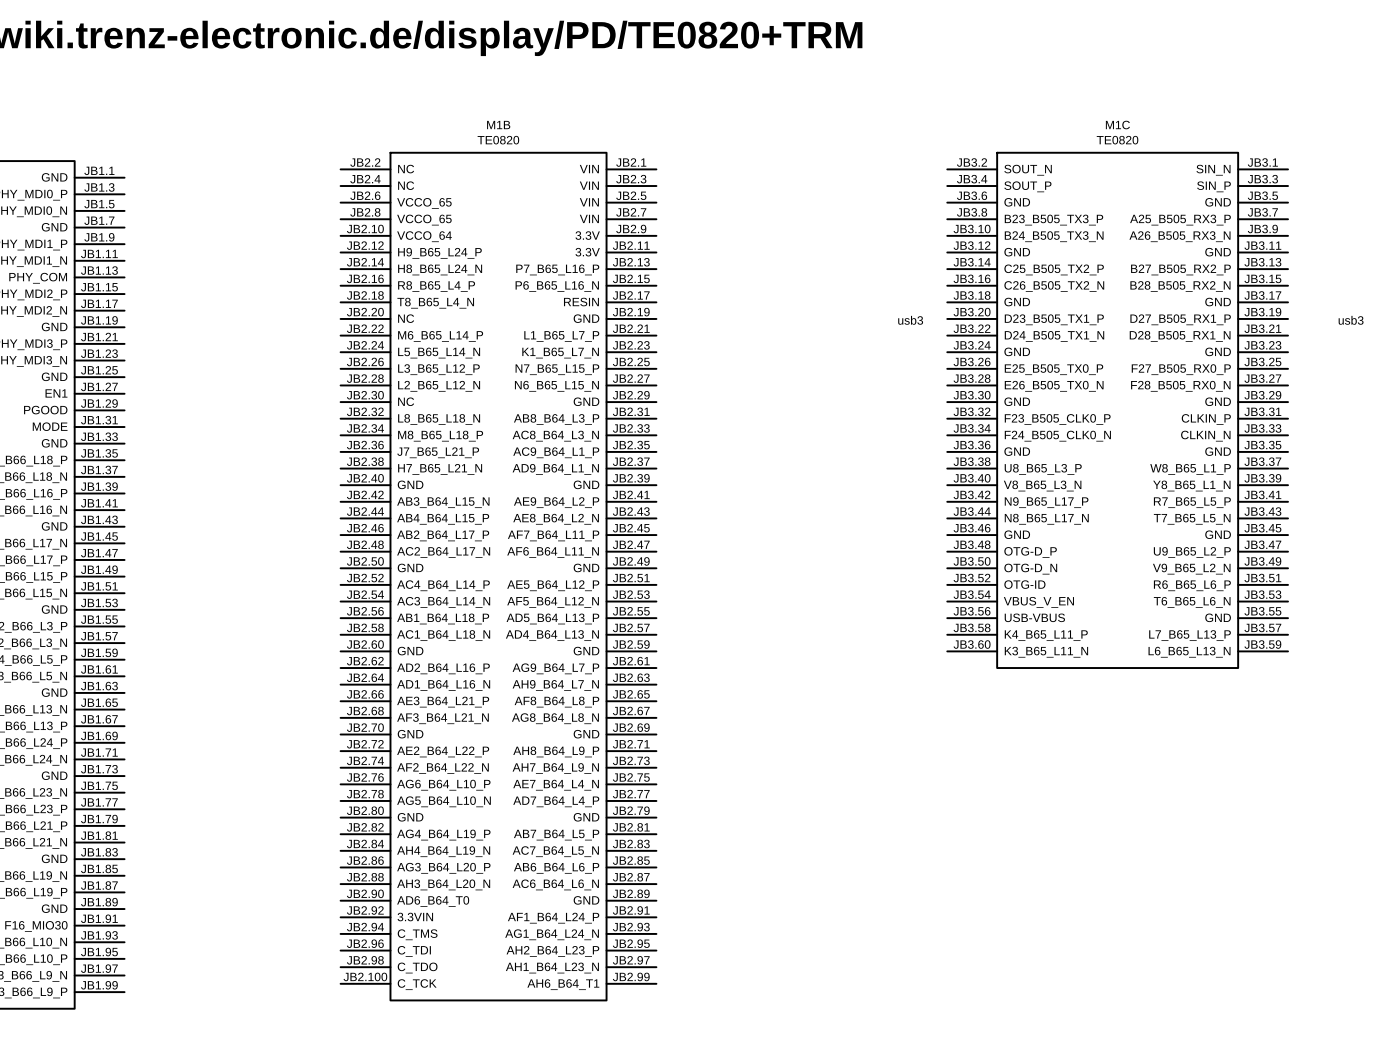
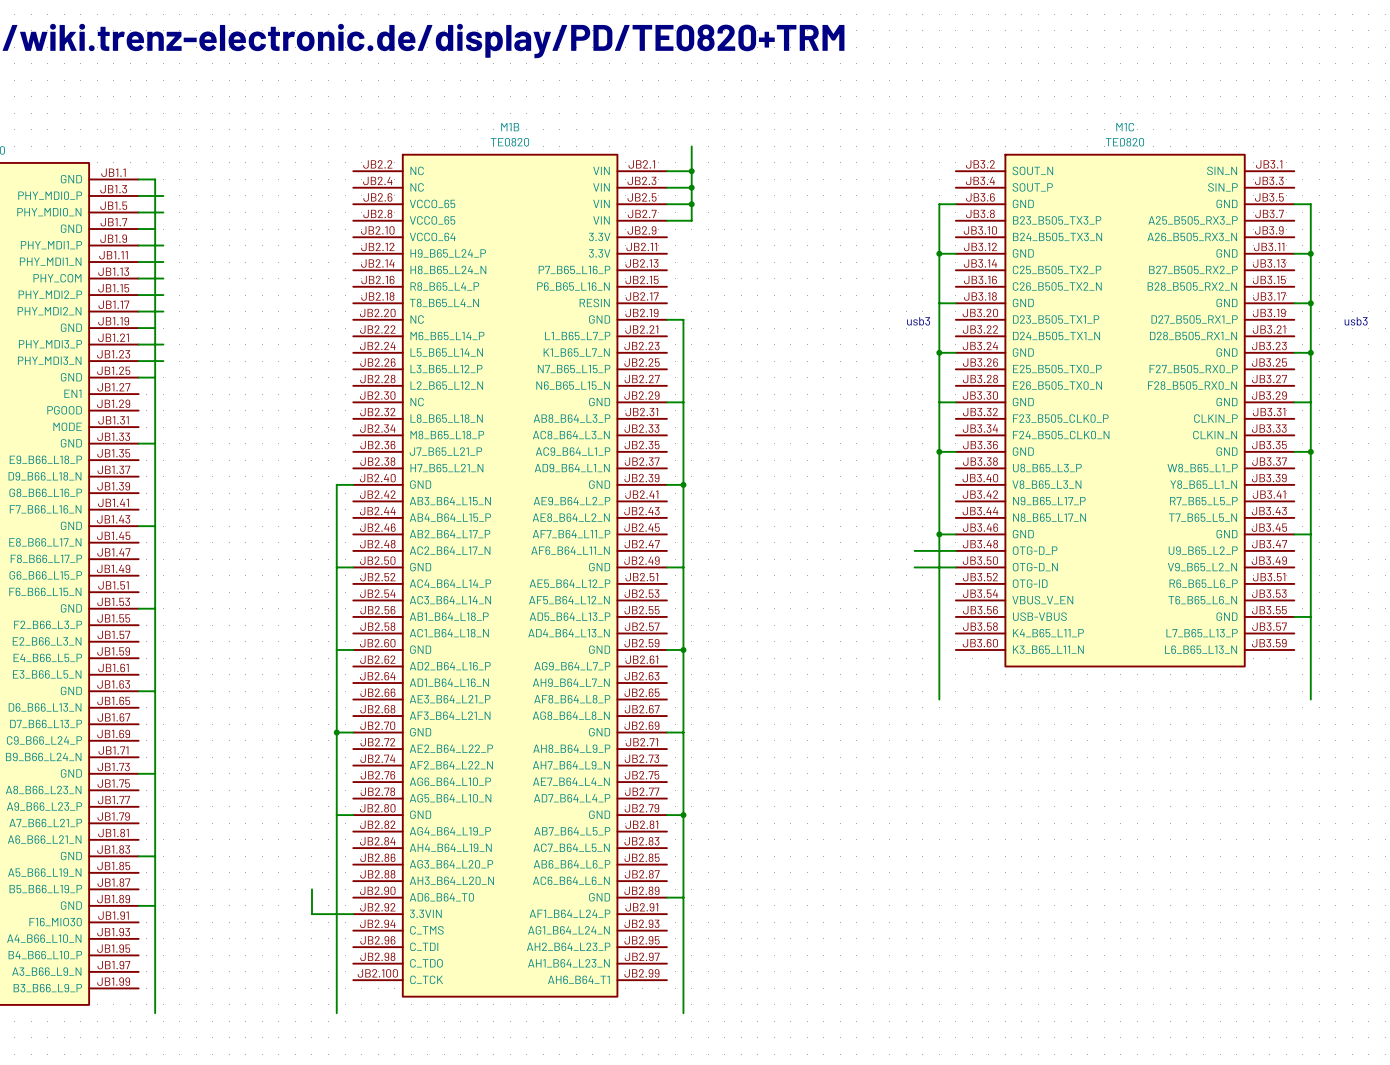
wire: none -> (691, 146) (691, 220) (666, 220)
wire: none -> (666, 171) (691, 171)
junction: none -> (691, 171)
wire: none -> (138, 179) (155, 179) (155, 1013)
wire: none -> (666, 187) (691, 187)
junction: none -> (691, 187)
wire: none -> (138, 195) (163, 195)
wire: none -> (666, 204) (691, 204)
junction: none -> (691, 204)
wire: none -> (955, 204) (939, 204) (939, 699)
wire: none -> (1294, 204) (1310, 204) (1310, 699)
wire: none -> (138, 212) (163, 212)
wire: none -> (138, 229) (155, 229)
wire: none -> (138, 245) (163, 245)
wire: none -> (939, 253) (955, 253)
junction: none -> (939, 253)
wire: none -> (1294, 253) (1310, 253)
junction: none -> (1310, 253)
wire: none -> (138, 262) (163, 262)
wire: none -> (138, 278) (163, 278)
wire: none -> (138, 295) (163, 295)
wire: none -> (939, 303) (955, 303)
wire: none -> (1294, 303) (1310, 303)
junction: none -> (1310, 303)
wire: none -> (138, 311) (163, 311)
wire: none -> (666, 319) (683, 319) (683, 1013)
wire: none -> (138, 328) (155, 328)
wire: none -> (138, 344) (163, 344)
wire: none -> (939, 352) (955, 352)
junction: none -> (939, 352)
wire: none -> (1294, 352) (1310, 352)
junction: none -> (1310, 352)
wire: none -> (138, 361) (163, 361)
wire: none -> (138, 377) (155, 377)
wire: none -> (666, 402) (683, 402)
wire: none -> (939, 402) (955, 402)
wire: none -> (1294, 402) (1310, 402)
wire: none -> (138, 443) (155, 443)
wire: none -> (939, 451) (955, 451)
junction: none -> (939, 451)
wire: none -> (1294, 451) (1310, 451)
junction: none -> (1310, 451)
wire: none -> (353, 484) (336, 484) (336, 1013)
wire: none -> (666, 484) (683, 484)
junction: none -> (683, 484)
wire: none -> (138, 526) (155, 526)
wire: none -> (939, 534) (955, 534)
junction: none -> (939, 534)
wire: none -> (1294, 534) (1310, 534)
wire: none -> (914, 550) (955, 550)
wire: none -> (336, 567) (353, 567)
wire: none -> (666, 567) (683, 567)
wire: none -> (914, 567) (955, 567)
wire: none -> (138, 608) (155, 608)
wire: none -> (1294, 616) (1310, 616)
wire: none -> (336, 649) (353, 649)
wire: none -> (666, 649) (683, 649)
junction: none -> (683, 649)
wire: none -> (138, 691) (155, 691)
wire: none -> (336, 732) (353, 732)
junction: none -> (336, 732)
wire: none -> (666, 732) (683, 732)
wire: none -> (138, 773) (155, 773)
wire: none -> (336, 815) (353, 815)
wire: none -> (666, 815) (683, 815)
junction: none -> (683, 815)
wire: none -> (138, 856) (155, 856)
wire: none -> (311, 889) (311, 914) (353, 914)
wire: none -> (666, 897) (683, 897)
wire: none -> (138, 905) (155, 905)

